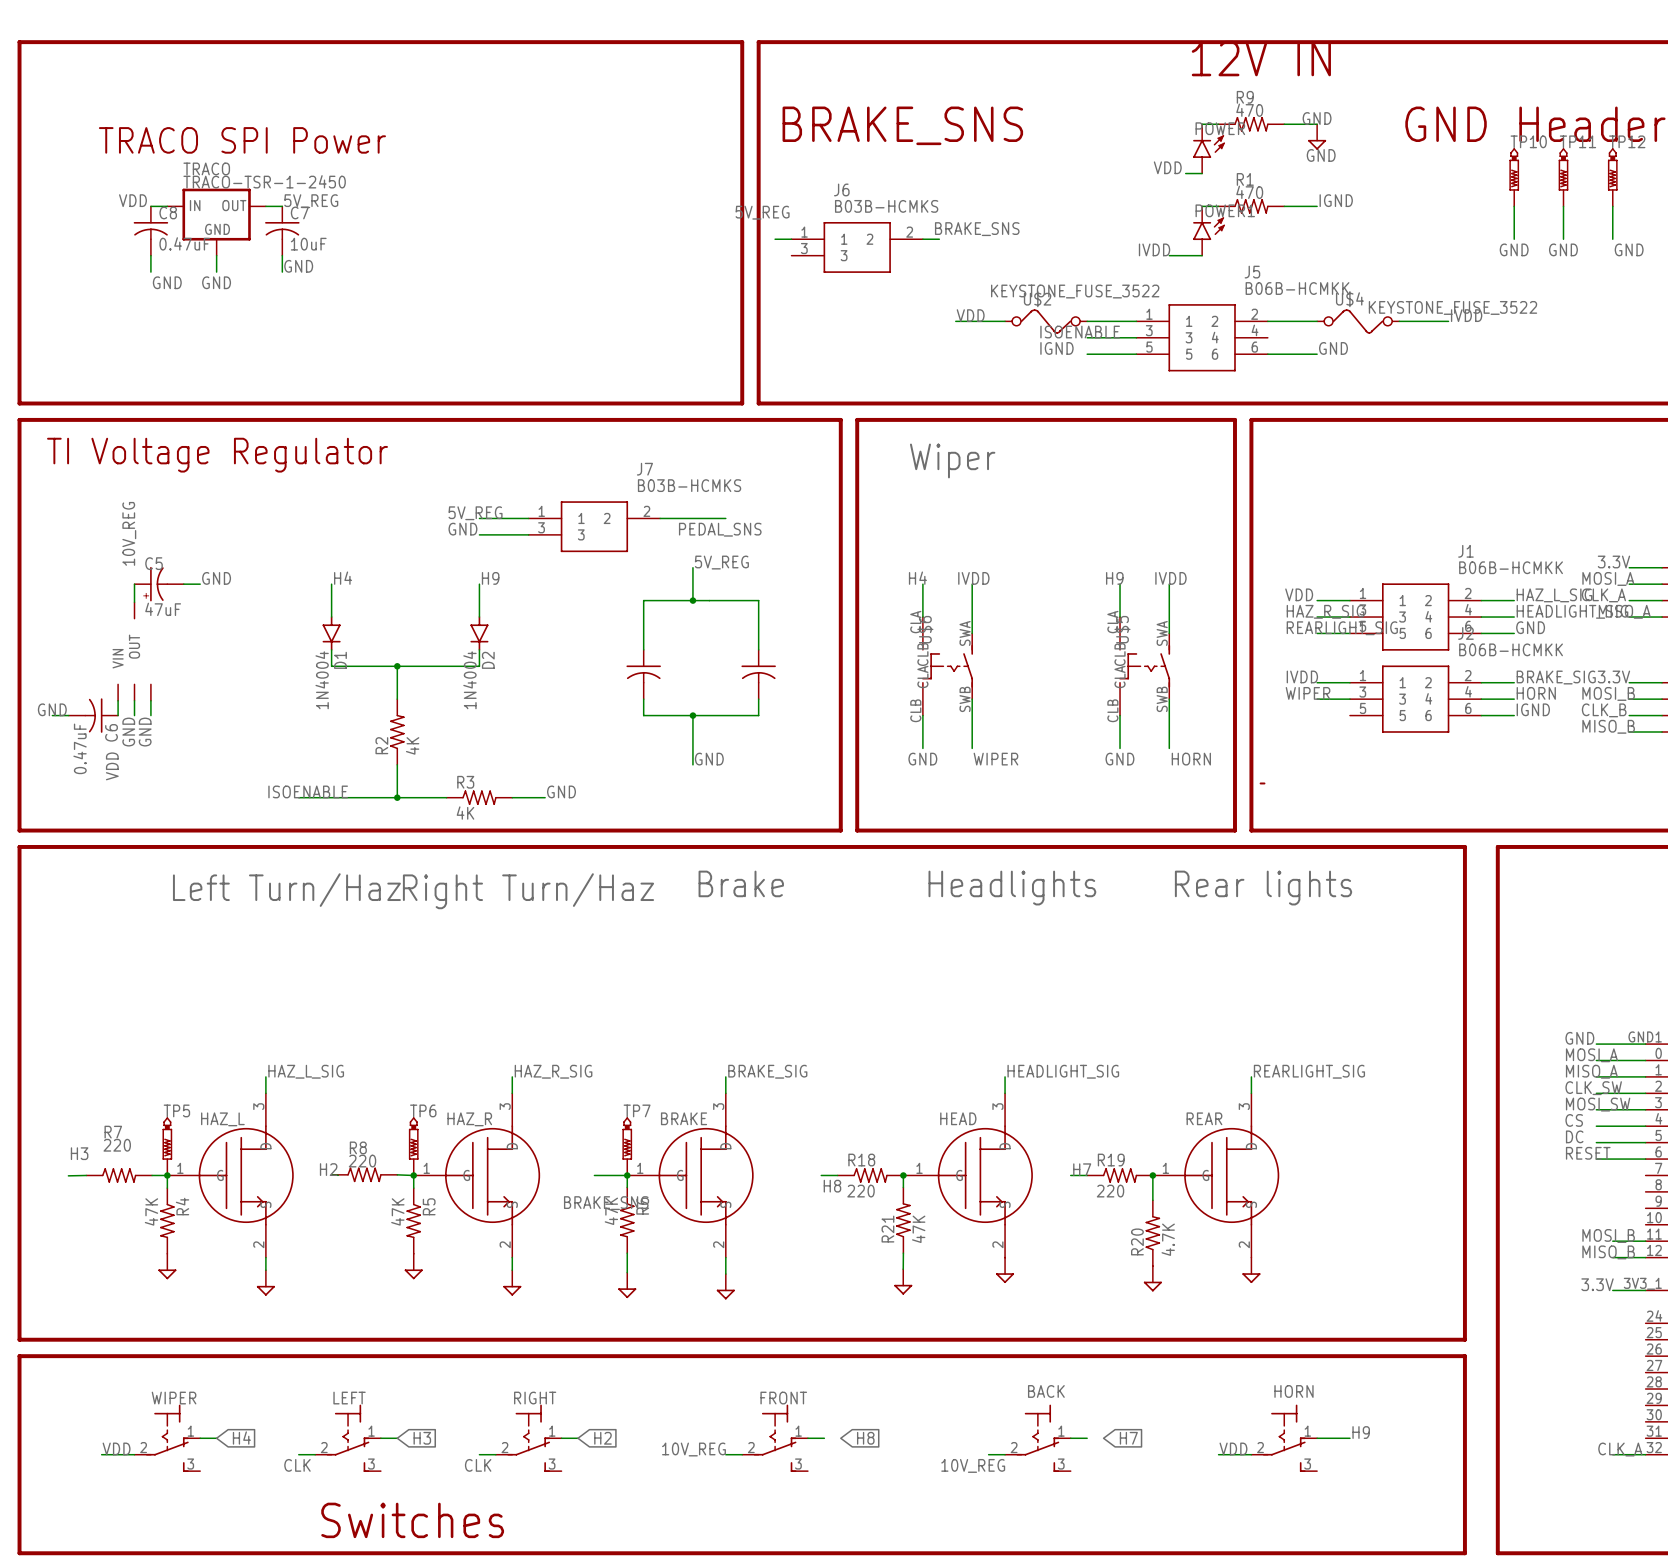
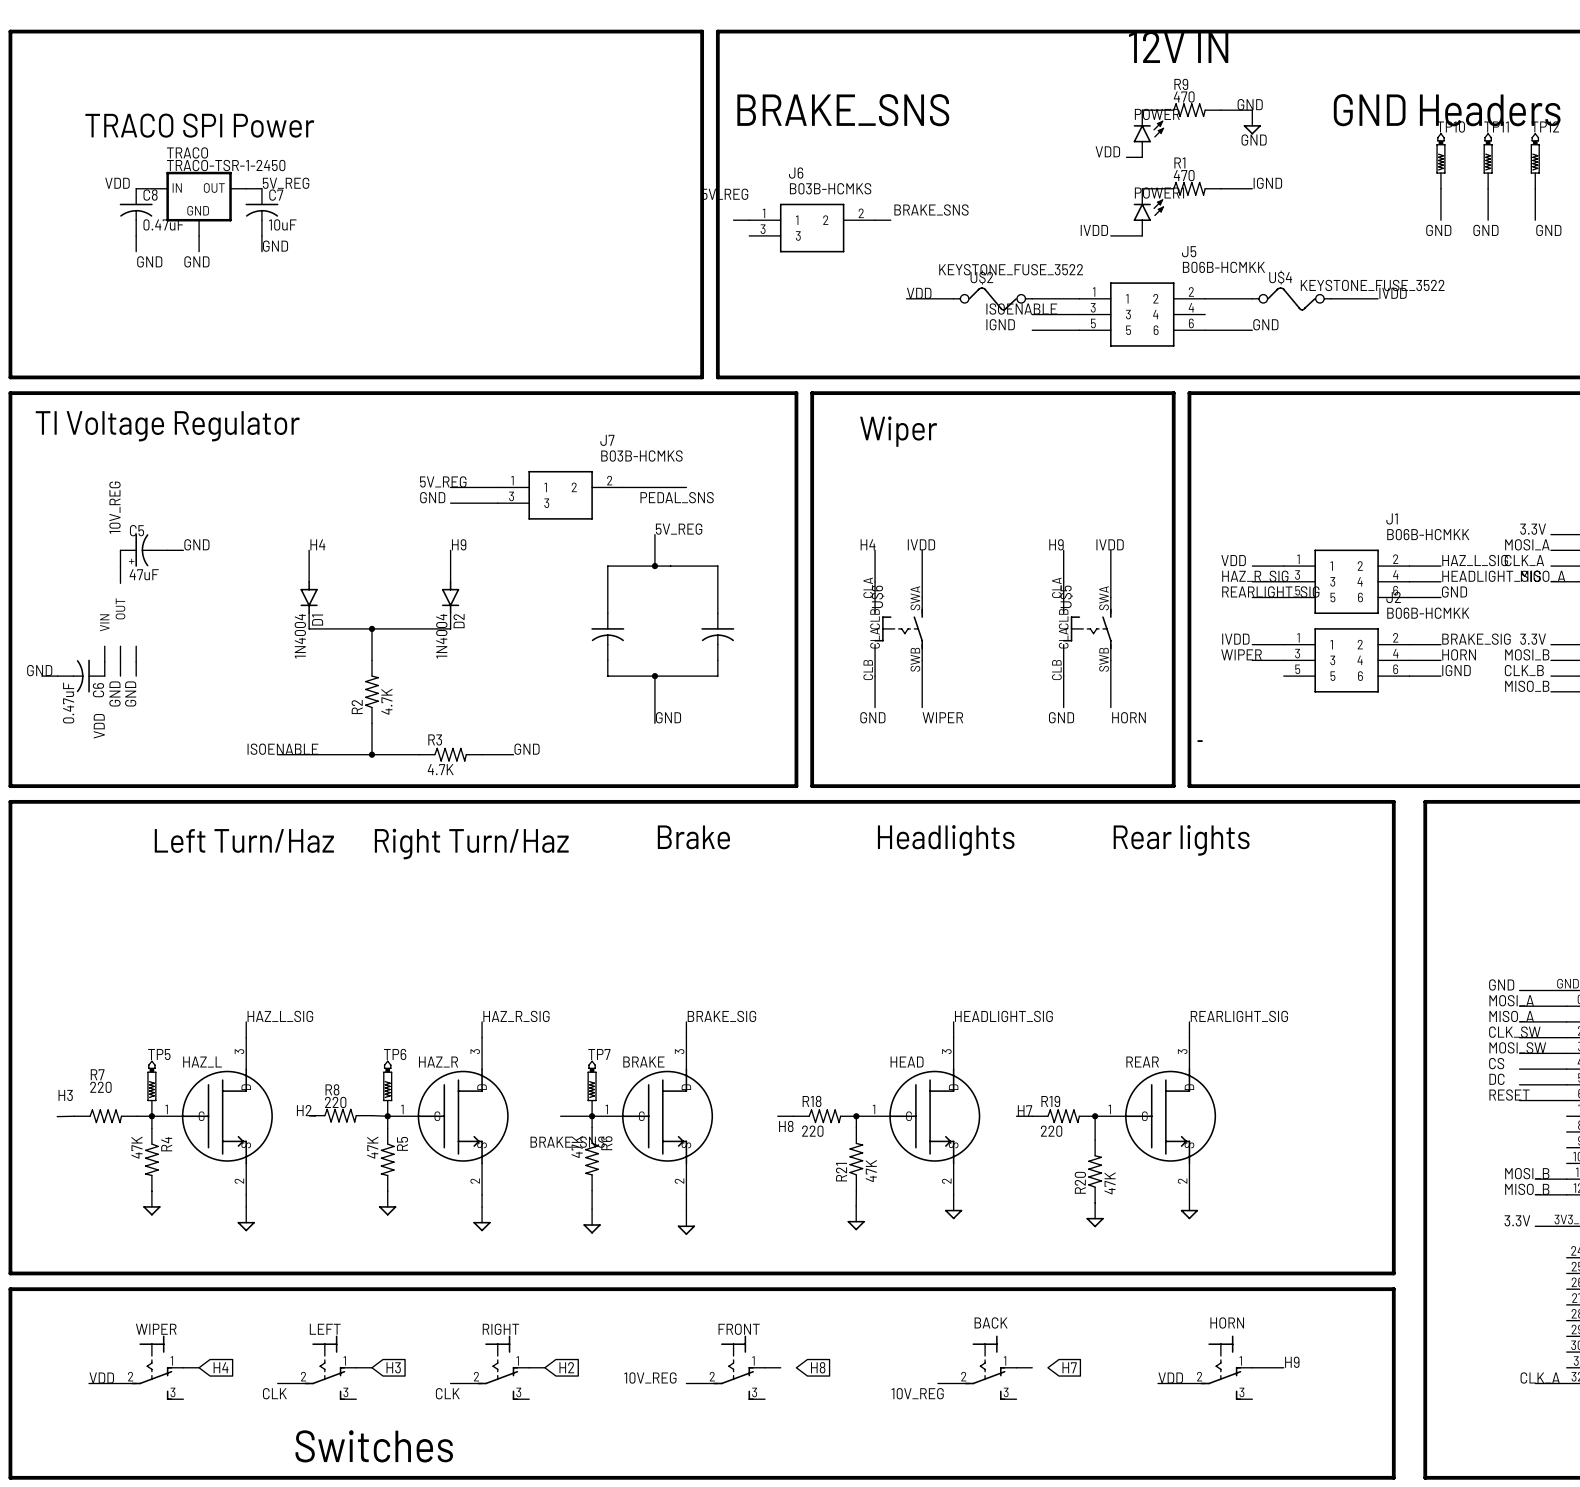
R2 value: 4K (412, 745) -> 4.7K (386, 701)
R3 value: 4K (465, 813) -> 4.7K (440, 769)
R20 value: 4.7K (1168, 1239) -> 47K (1110, 1183)

